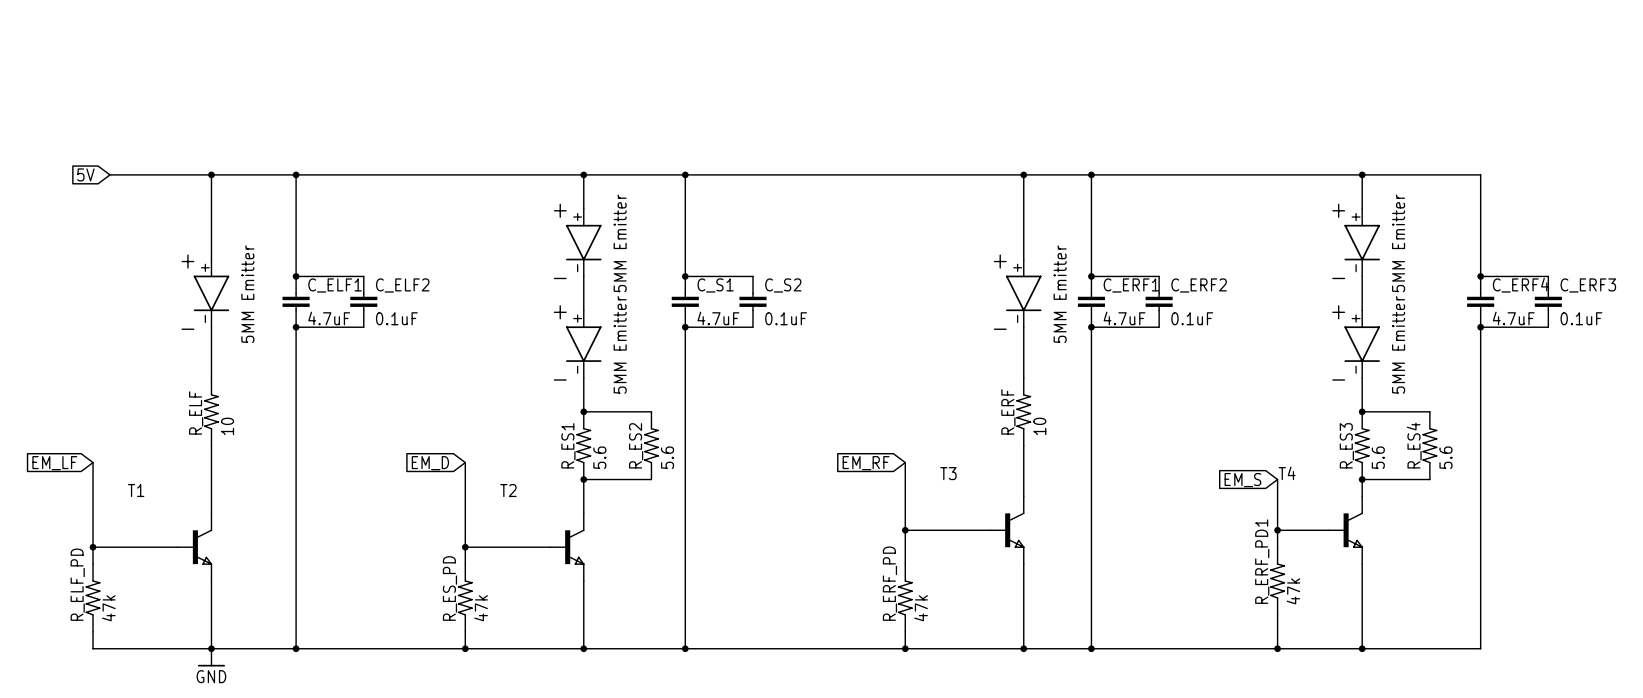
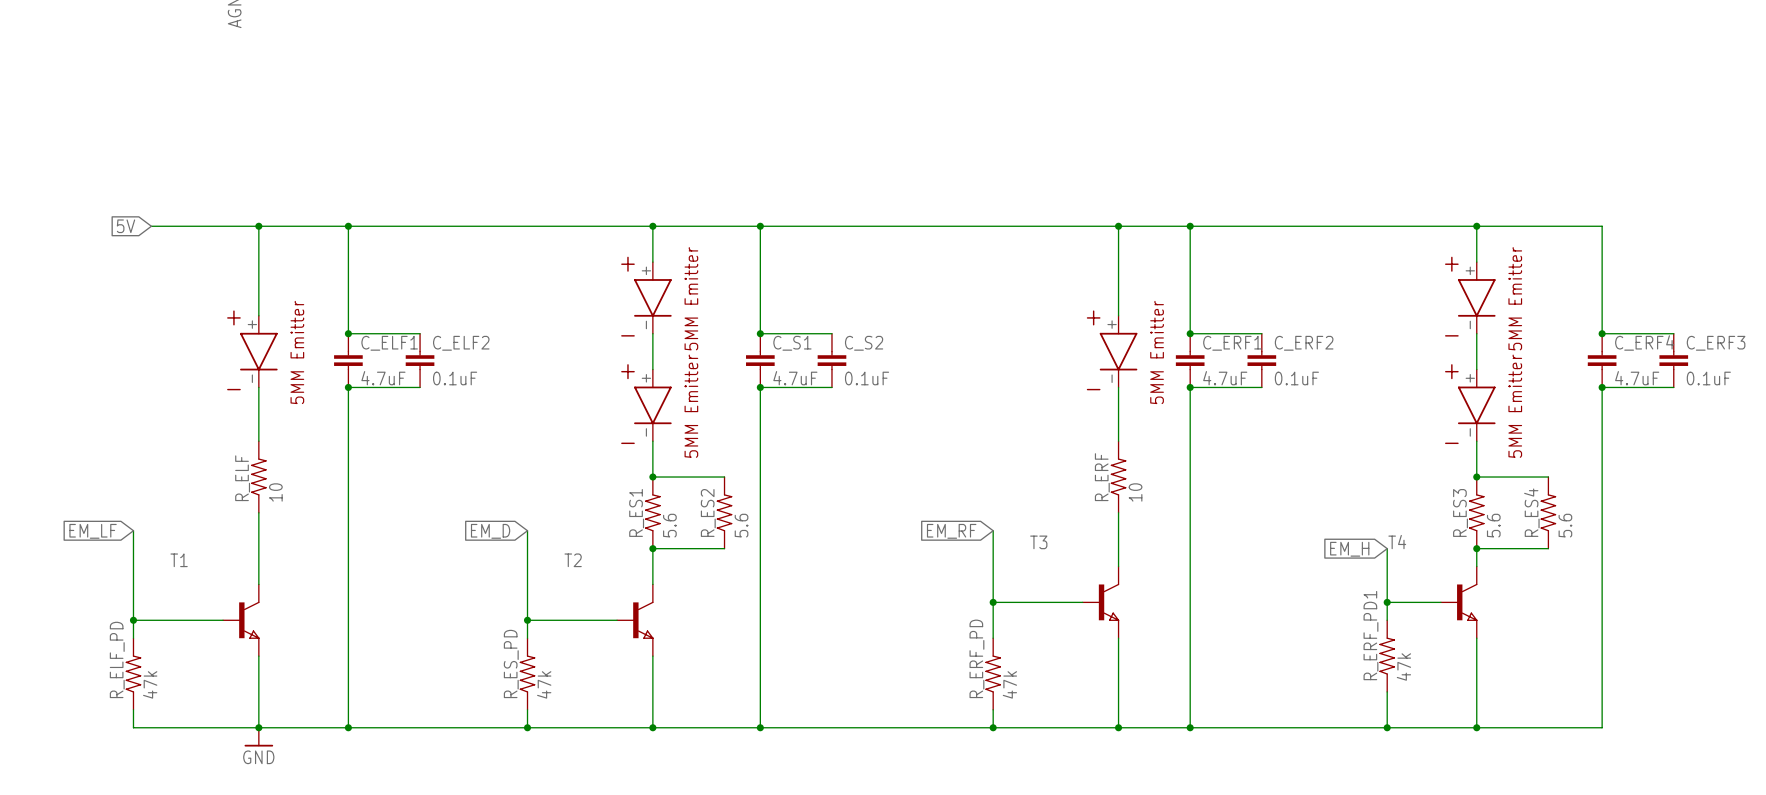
global label: EM_S (1242, 480) -> EM_H (1349, 549)

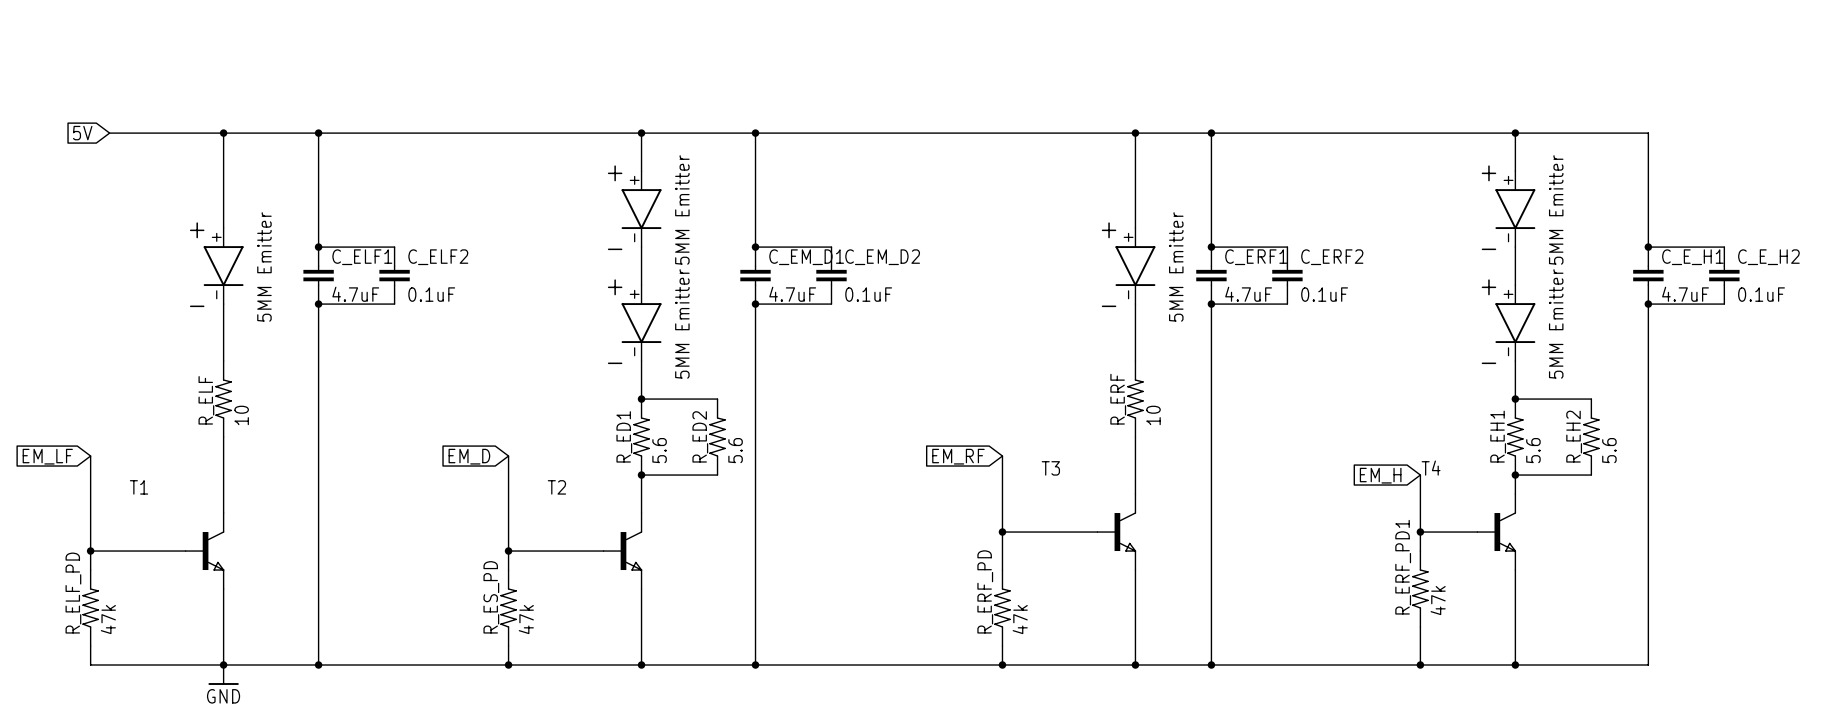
C_ERF4 name: C_ERF4 (1644, 342) -> C_E_H1 (1692, 257)
C_S1 name: C_S1 (792, 343) -> C_EM_D1 (806, 257)
C_S2 name: C_S2 (864, 343) -> C_EM_D2 (882, 257)
C_ERF3 name: C_ERF3 (1716, 343) -> C_E_H2 (1768, 257)
R_ES1 name: R_ES1 (636, 512) -> R_ED1 (624, 436)
R_ES2 name: R_ES2 (708, 512) -> R_ED2 (700, 436)
R_ES3 name: R_ES3 (1460, 512) -> R_EH1 (1498, 436)
R_ES4 name: R_ES4 (1531, 512) -> R_EH2 (1574, 436)

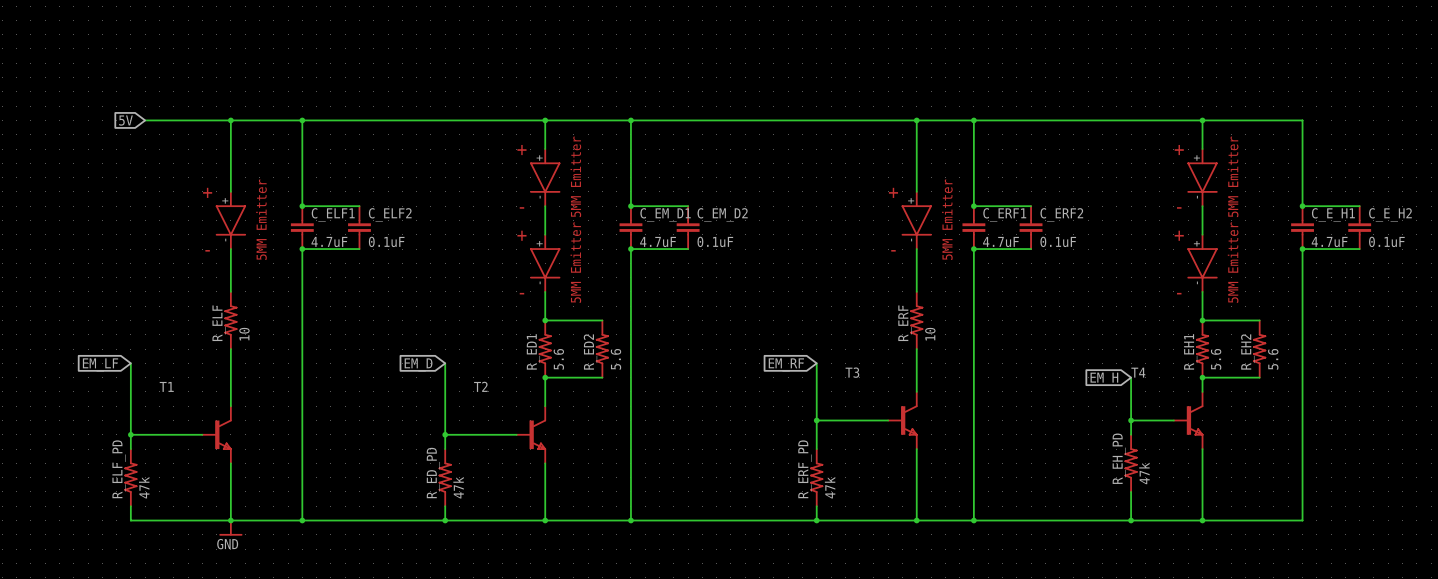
R_ERF_PD1 name: R_ERF_PD1 (1403, 567) -> R_EH_PD (1119, 458)
R_ES_PD name: R_ES_PD (491, 597) -> R_ED_PD (433, 473)

